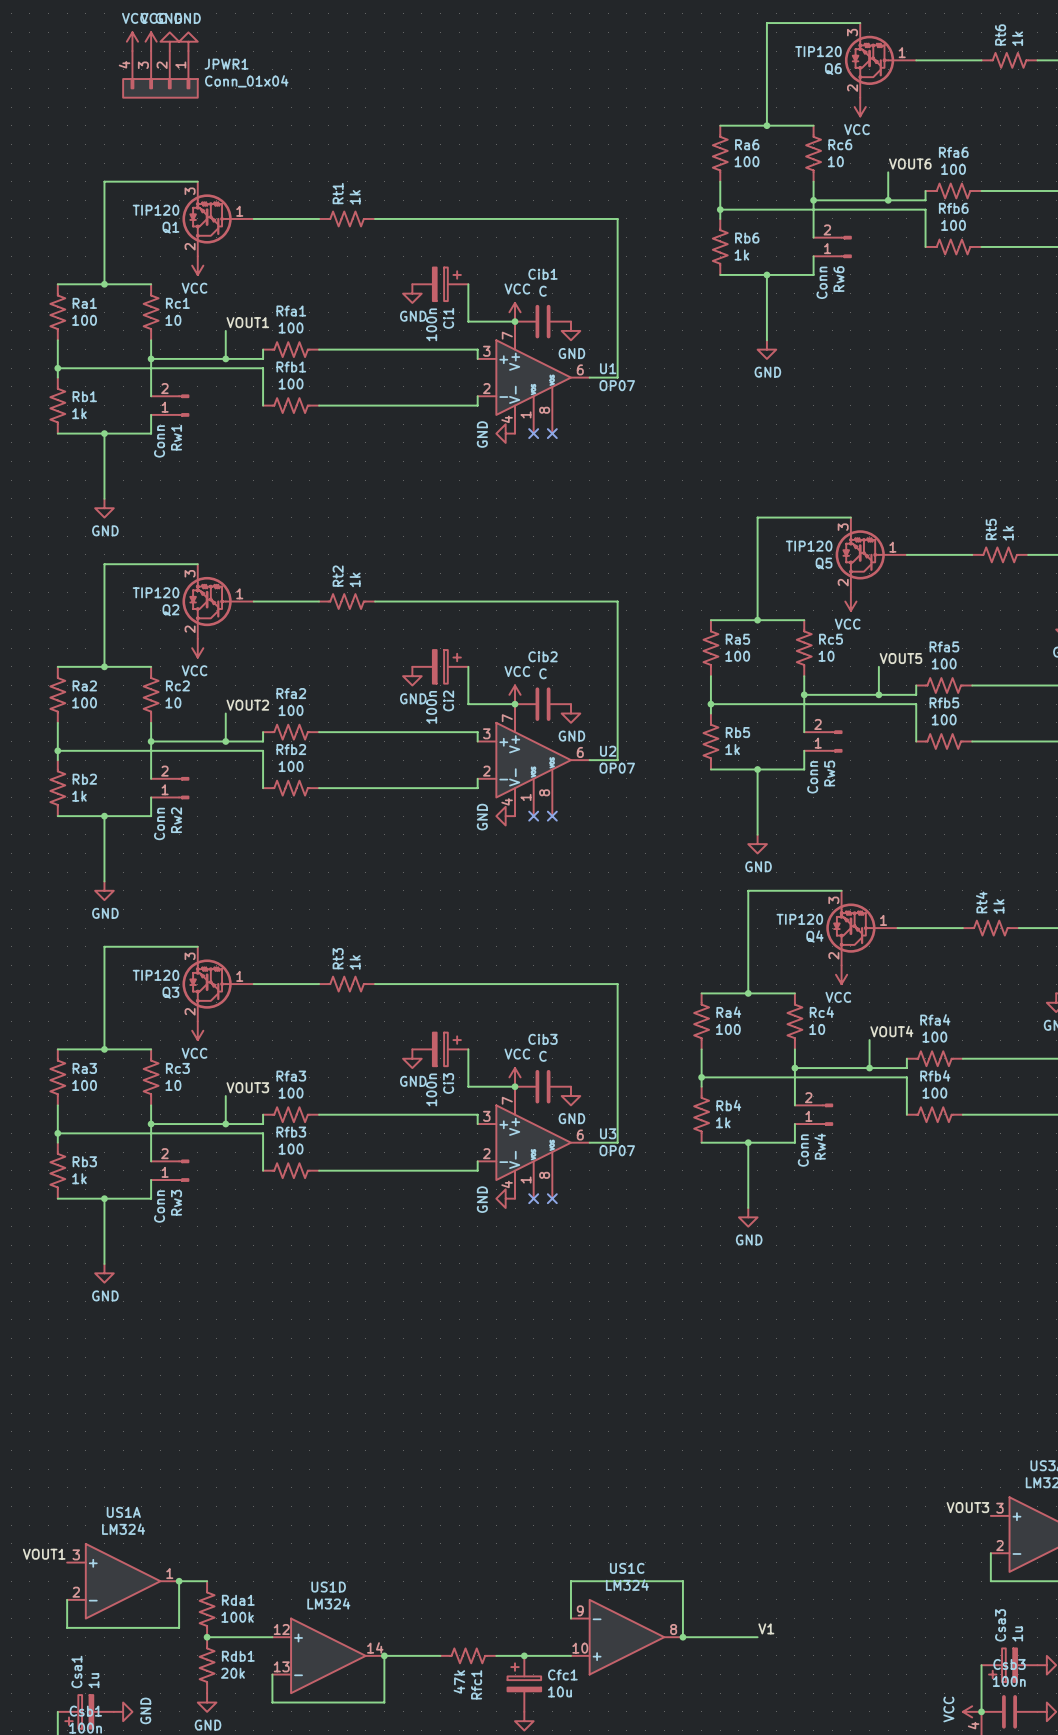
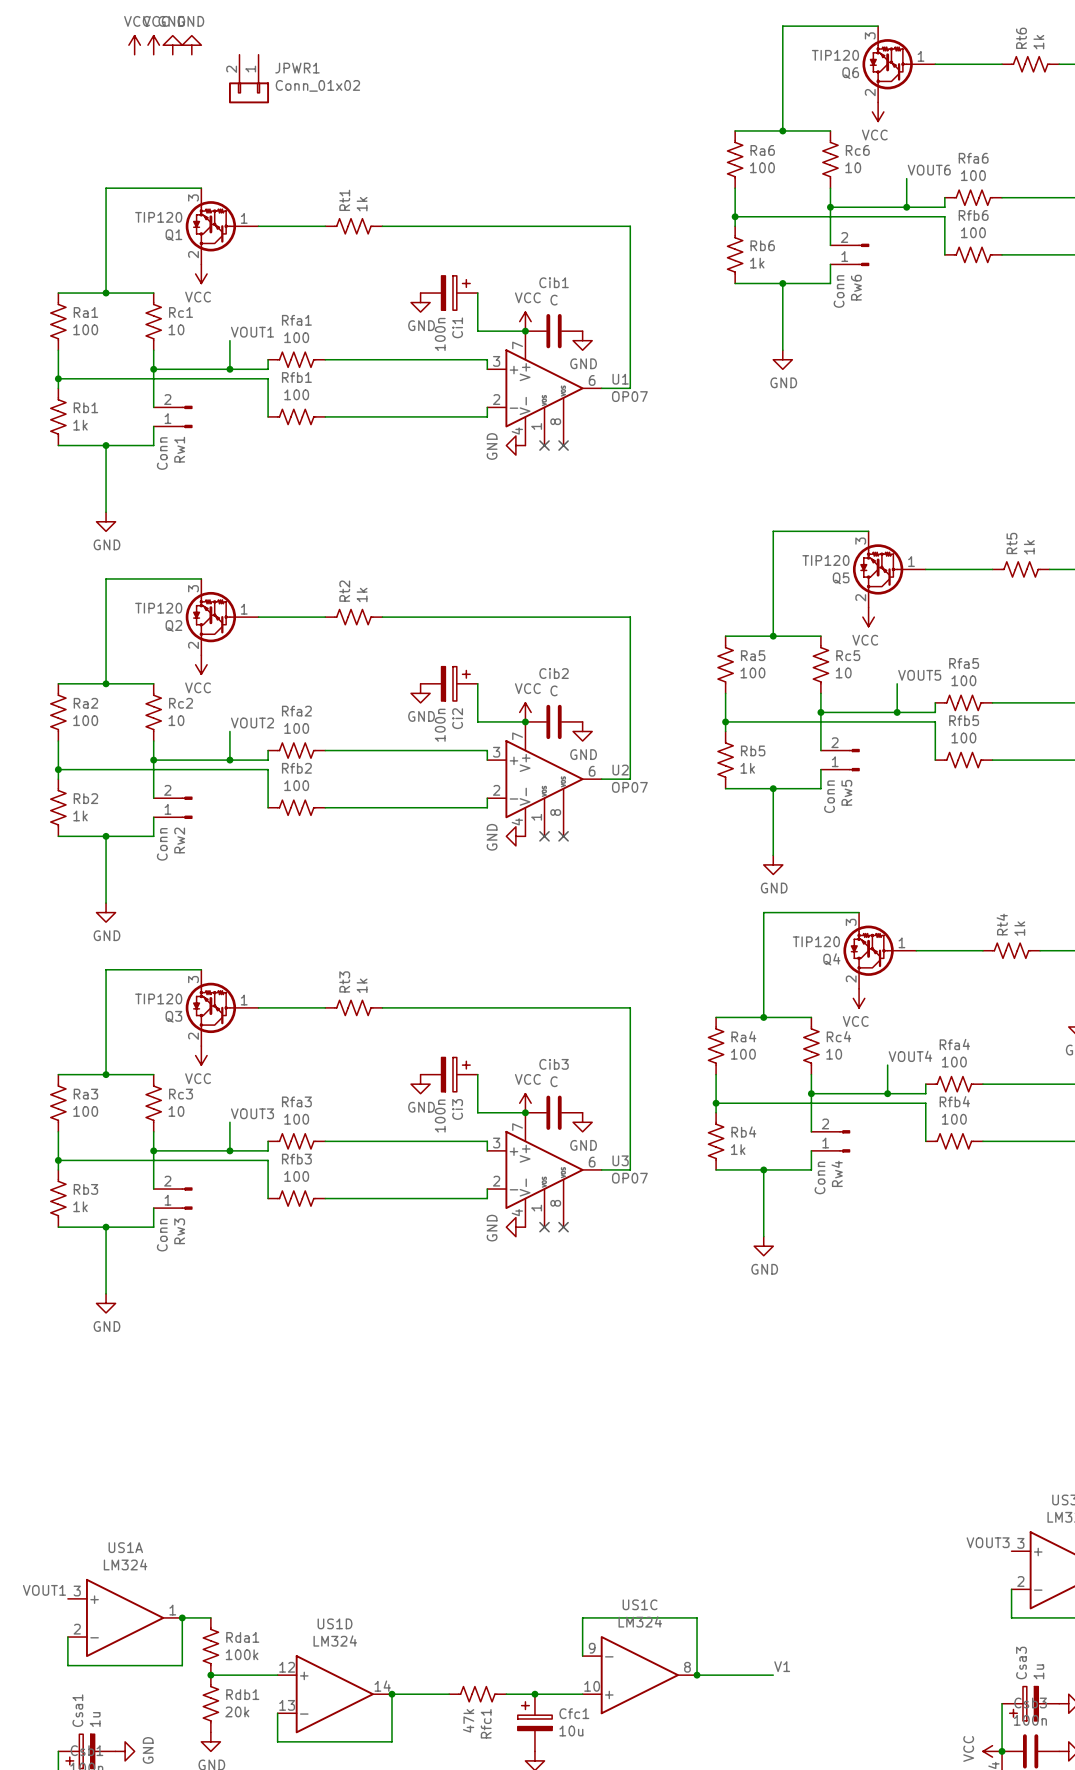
JPWR1 symbol: [122, 51, 199, 99] -> [229, 54, 270, 104]
JPWR1 name position: JPWR1 (226, 64) -> JPWR1 (297, 68)
JPWR1 value: Conn_01x04 (246, 81) -> Conn_01x02 (317, 85)

